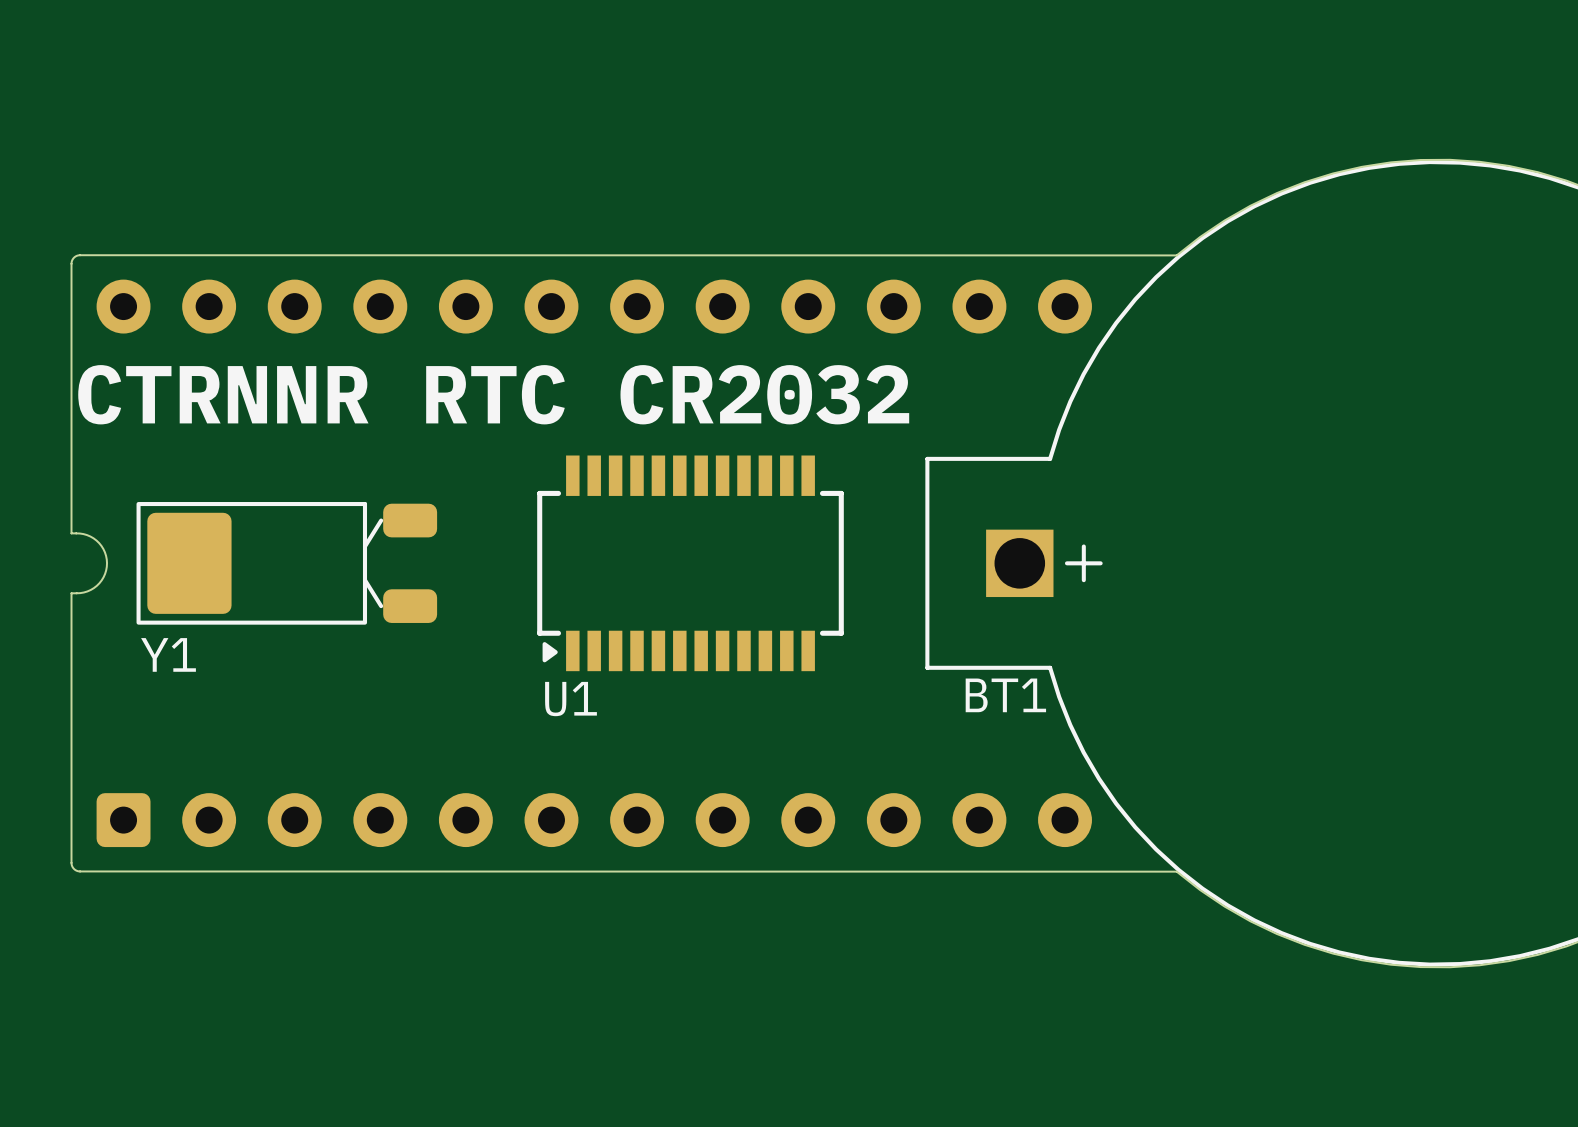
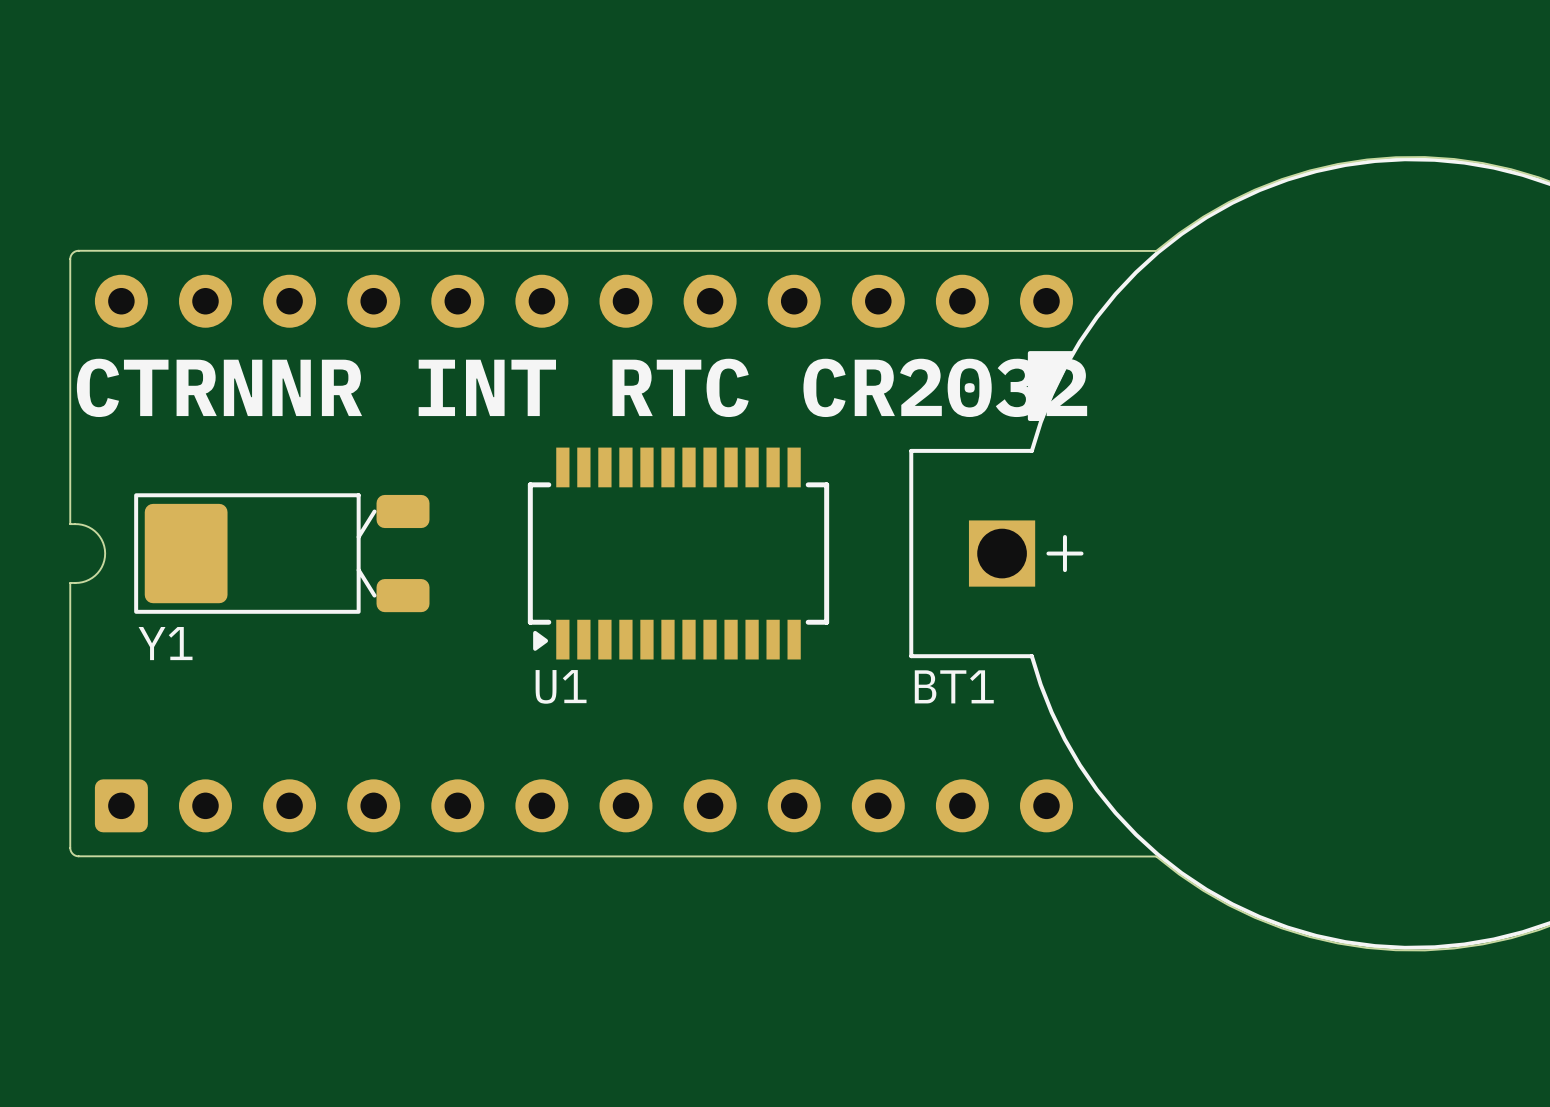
drawing: none -> [1027, 351, 1075, 421]
text: CTRNNR RTC CR2032 (493, 394) -> CTRNNR INT RTC CR2032 (582, 387)
BT1 name position: BT1 (1005, 695) -> BT1 (954, 686)

